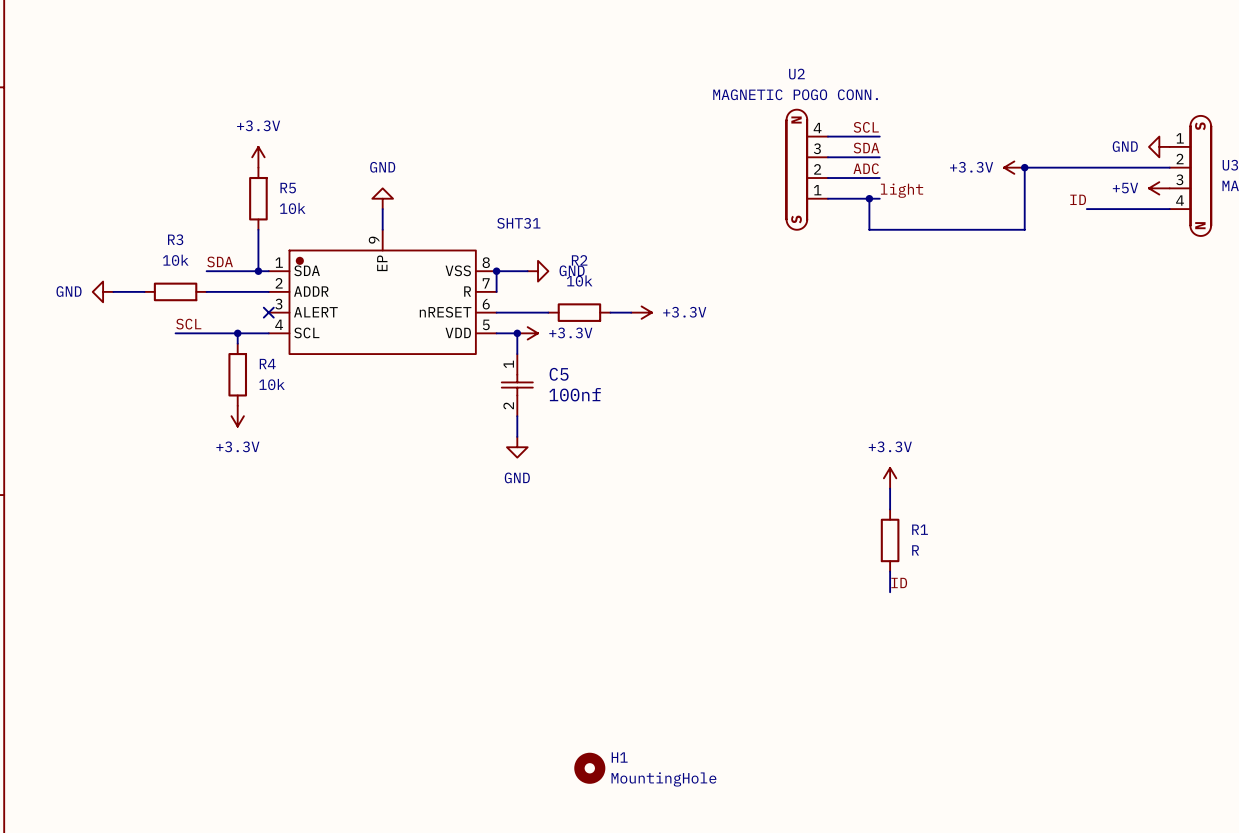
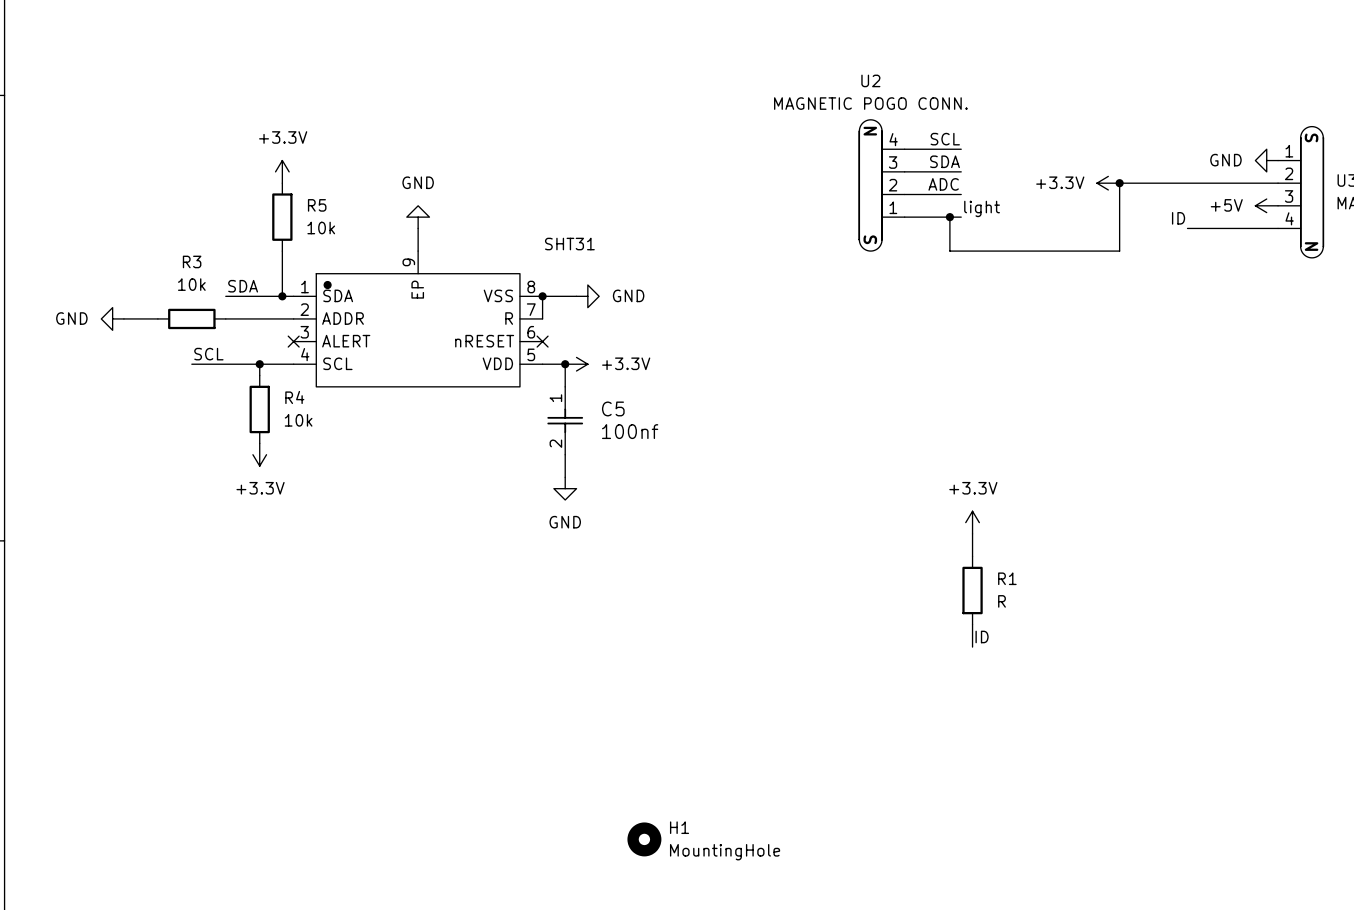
wire: (496, 312) (548, 312) -> none
no-connect mark: none -> (542, 341)
R2: 10k (579, 312) -> none
wire: (610, 312) (631, 312) -> none
power symbol: +3.3V (641, 312) -> none

